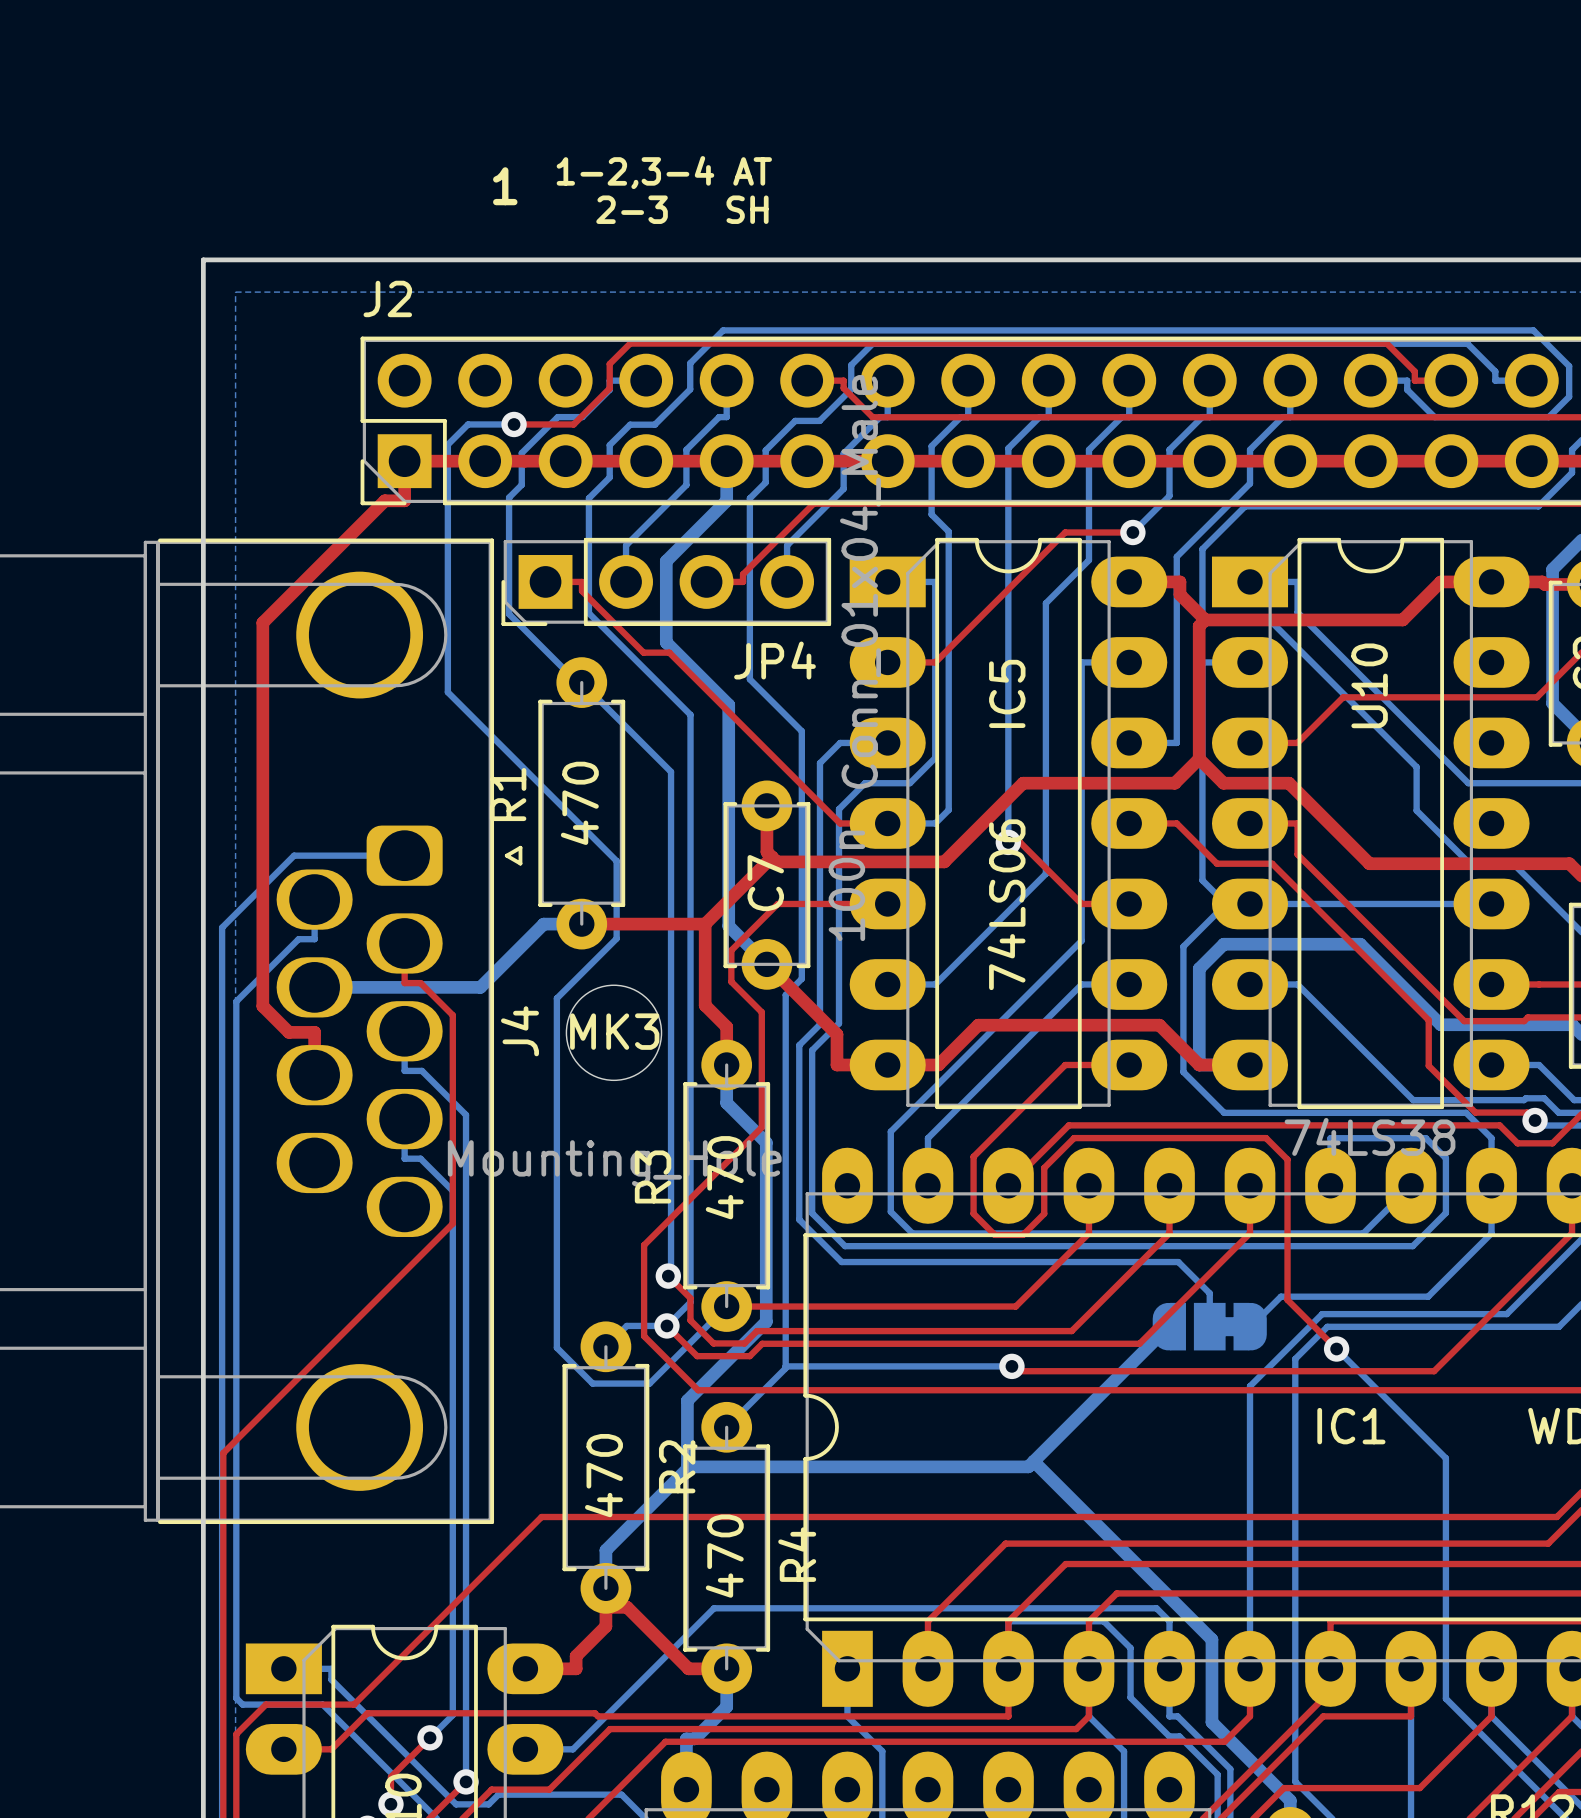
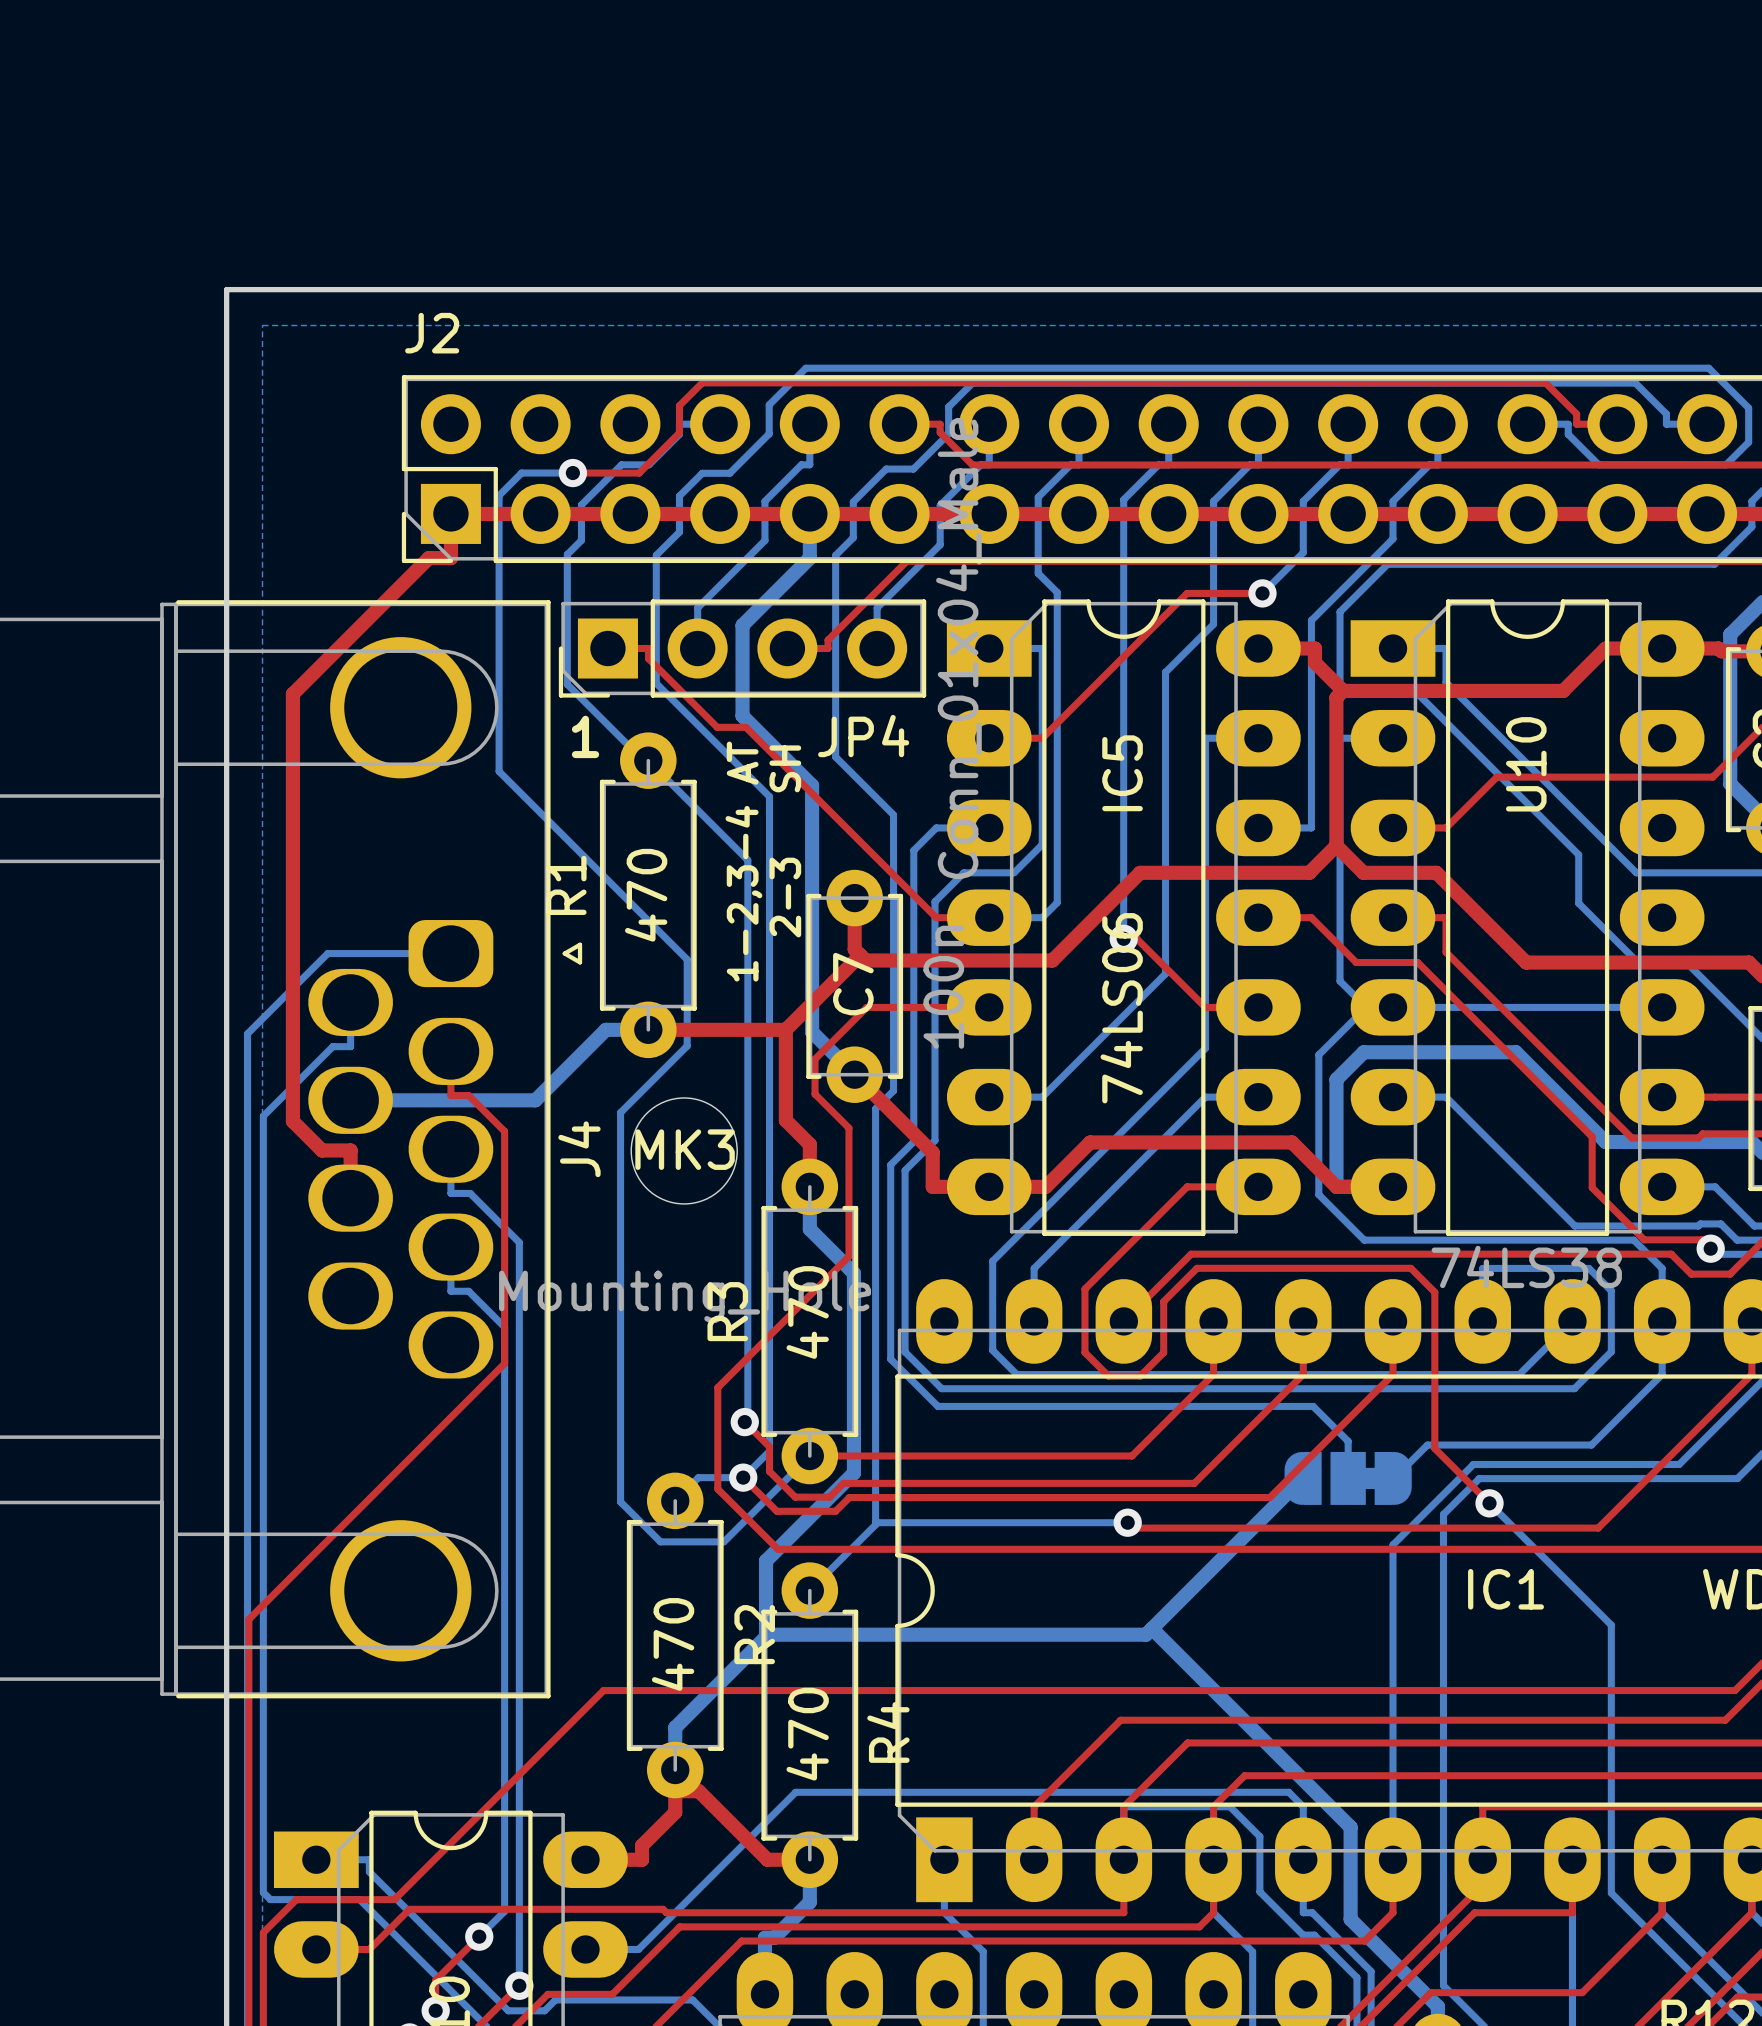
text rotation: 0° (664, 172) -> 90° counterclockwise (743, 861)
text position: 1-2,3-4 AT (664, 172) -> 1-2,3-4 AT (743, 861)
text position: 1 (505, 186) -> 1 (585, 736)
text rotation: 0° (682, 209) -> 90° counterclockwise (785, 841)
text position: 2-3 SH (682, 209) -> 2-3 SH (785, 841)

